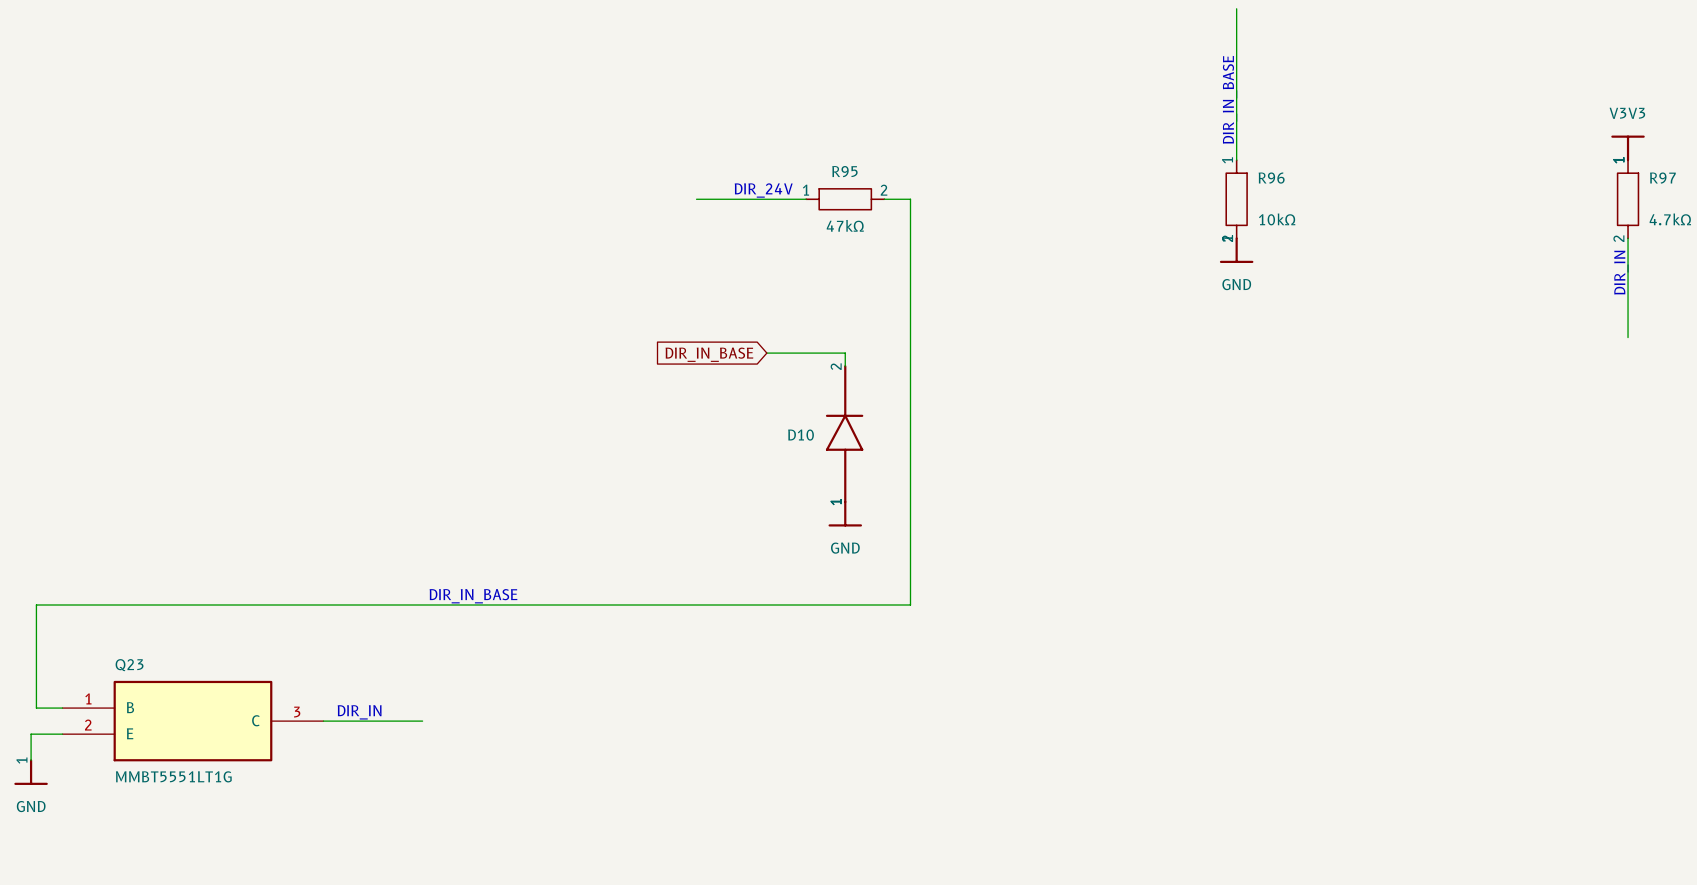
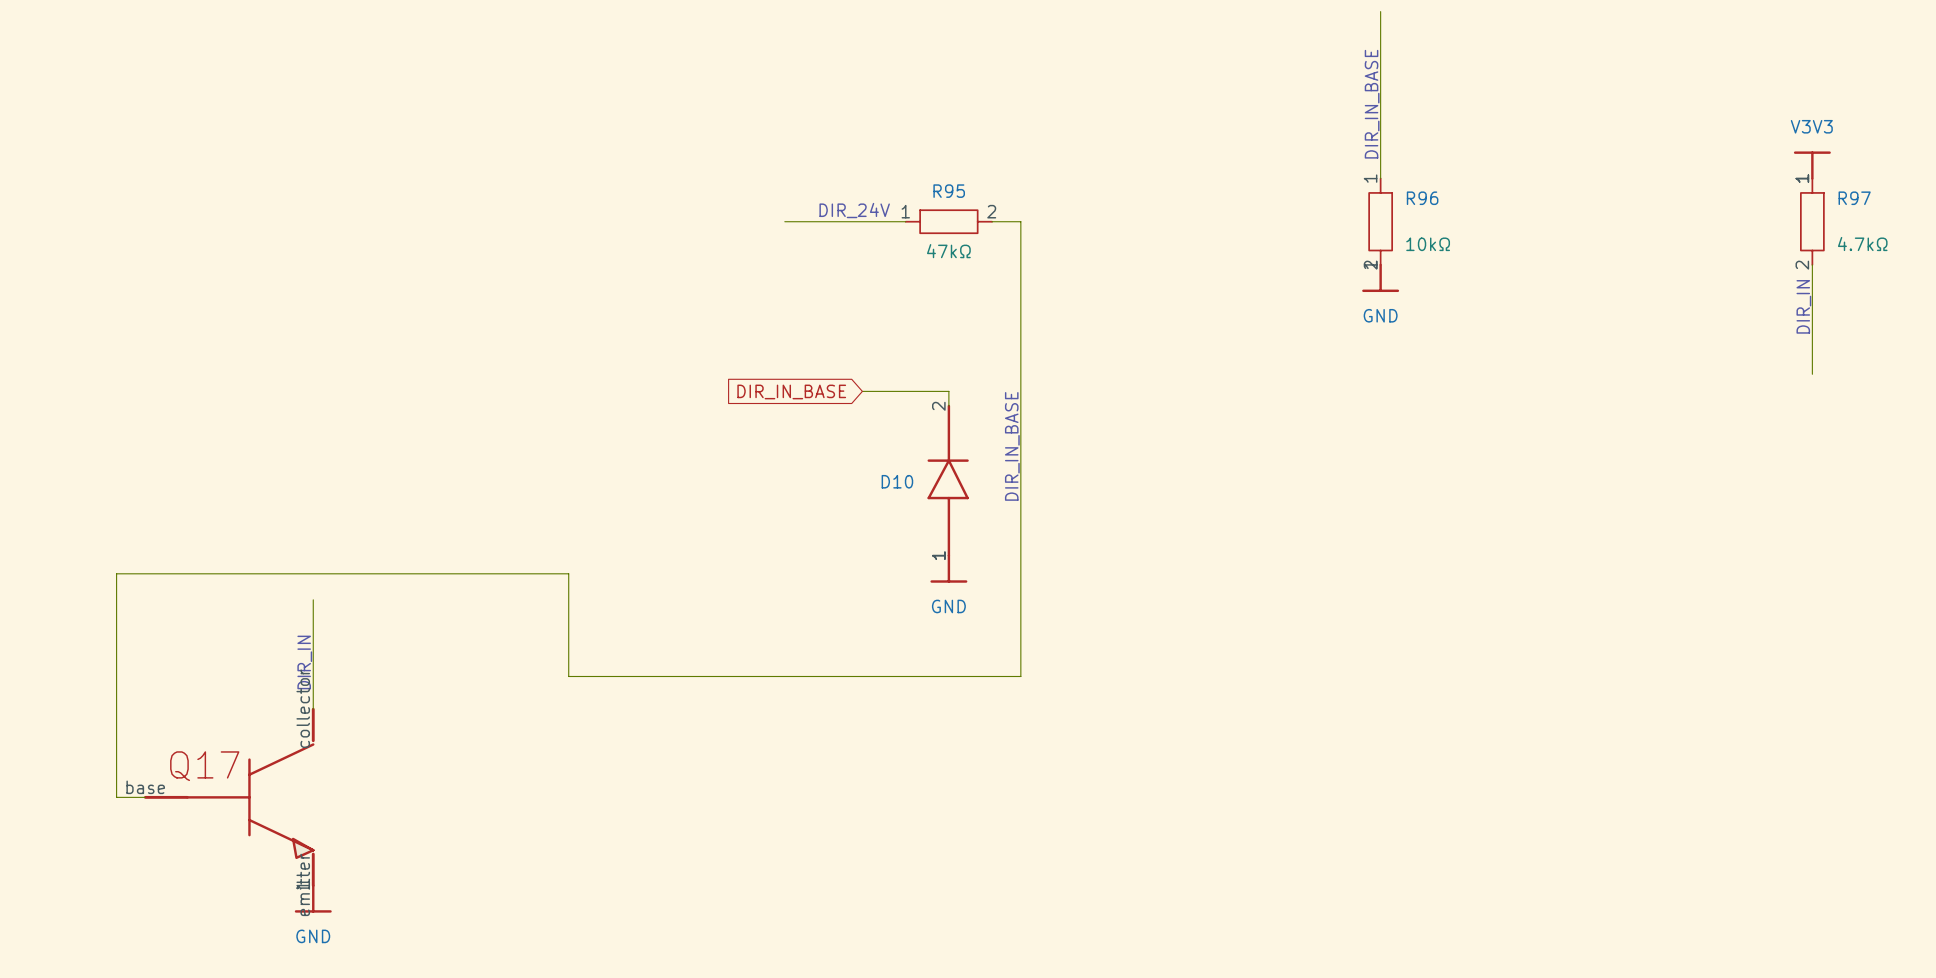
text: none -> DIR_IN_BASE (1012, 446)
wire: none -> (313, 599) (313, 709)
text: DIR_IN_BASE (473, 596) -> none
wire: (910, 605) (36, 605) (36, 708) (62, 708) -> (1020, 669) (1020, 676) (568, 676) (568, 573) (116, 573) (116, 797) (145, 797)
text rotation: 0° (359, 712) -> 90° counterclockwise (304, 662)
text position: DIR_IN (359, 712) -> DIR_IN (304, 662)
Q23: MMBT5551LT1G (192, 721) -> none
part: none -> (229, 797)
wire: (323, 721) (422, 721) -> none
wire: (62, 734) (31, 734) (31, 760) -> none
GND: (31, 772) -> none
GND: none -> (313, 898)

